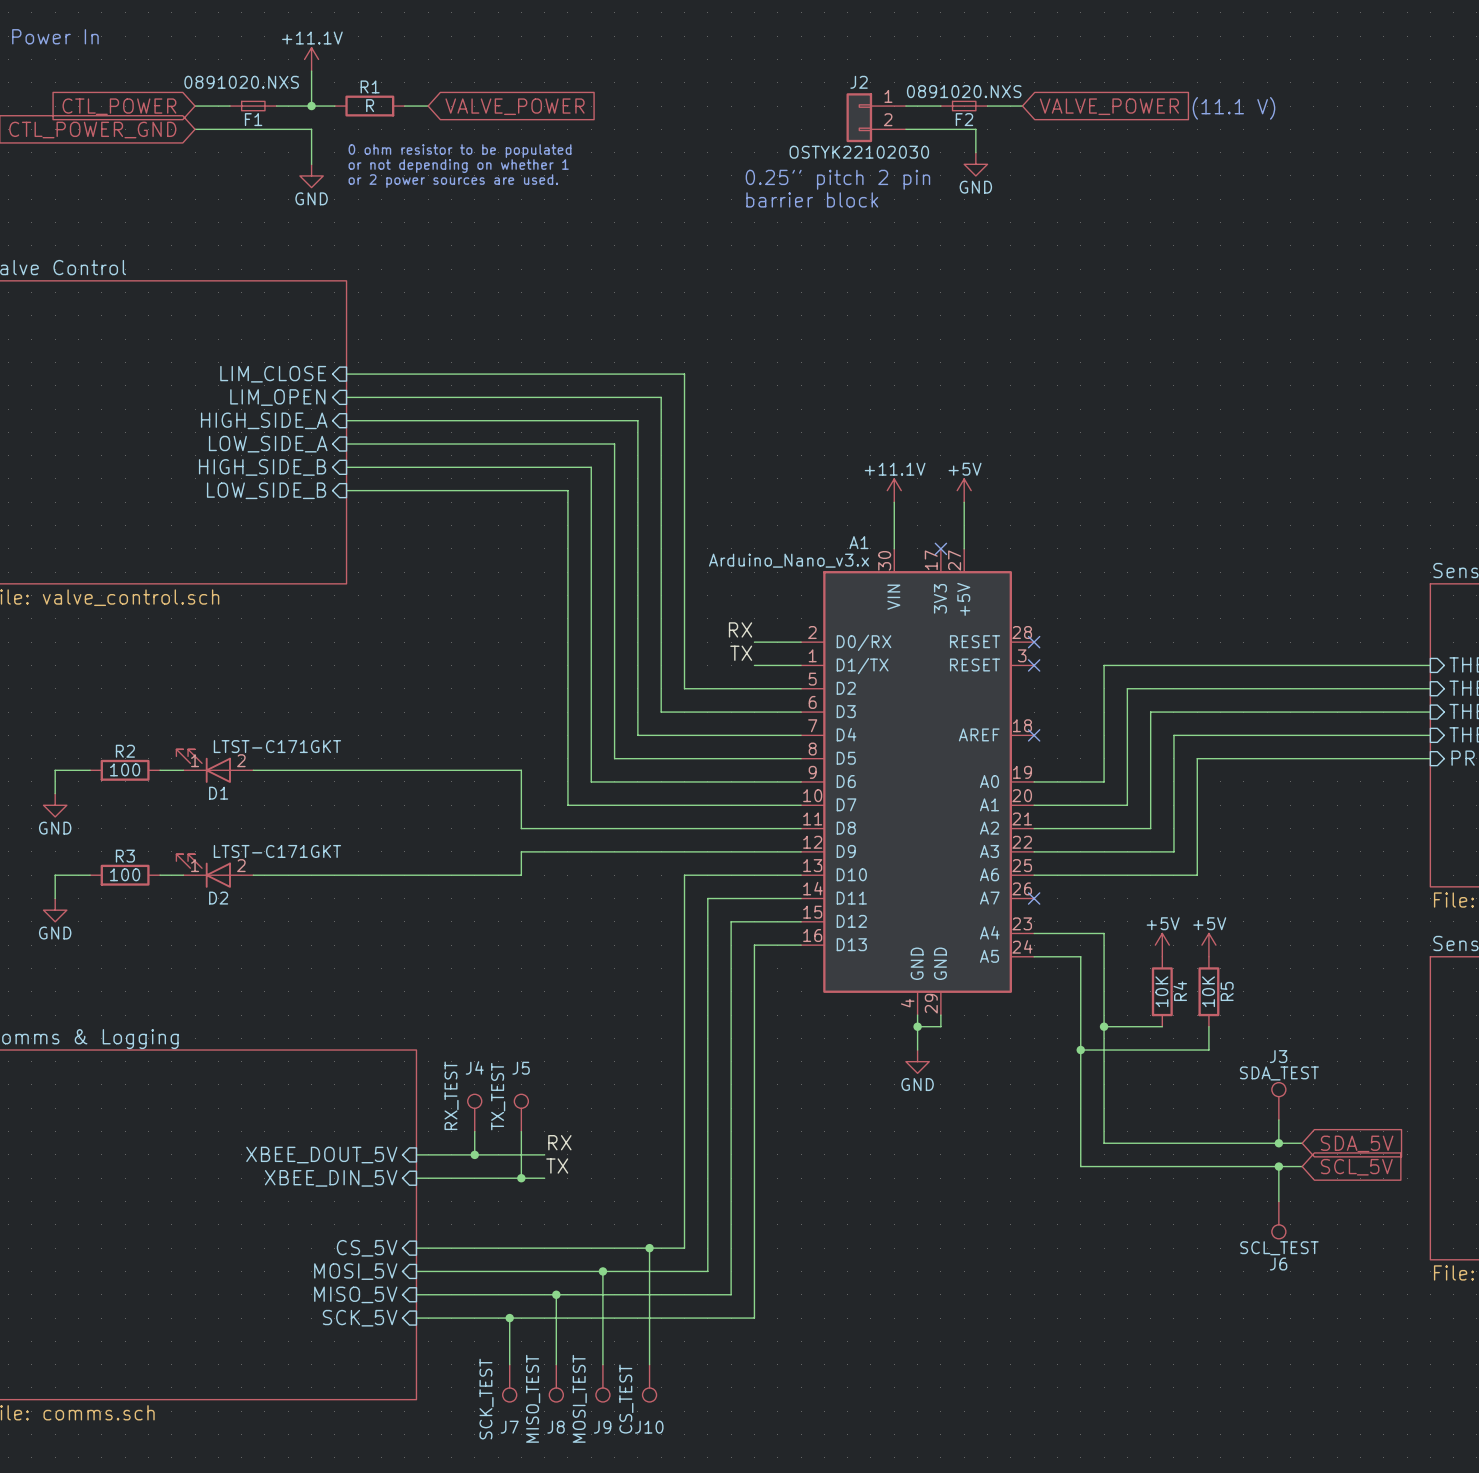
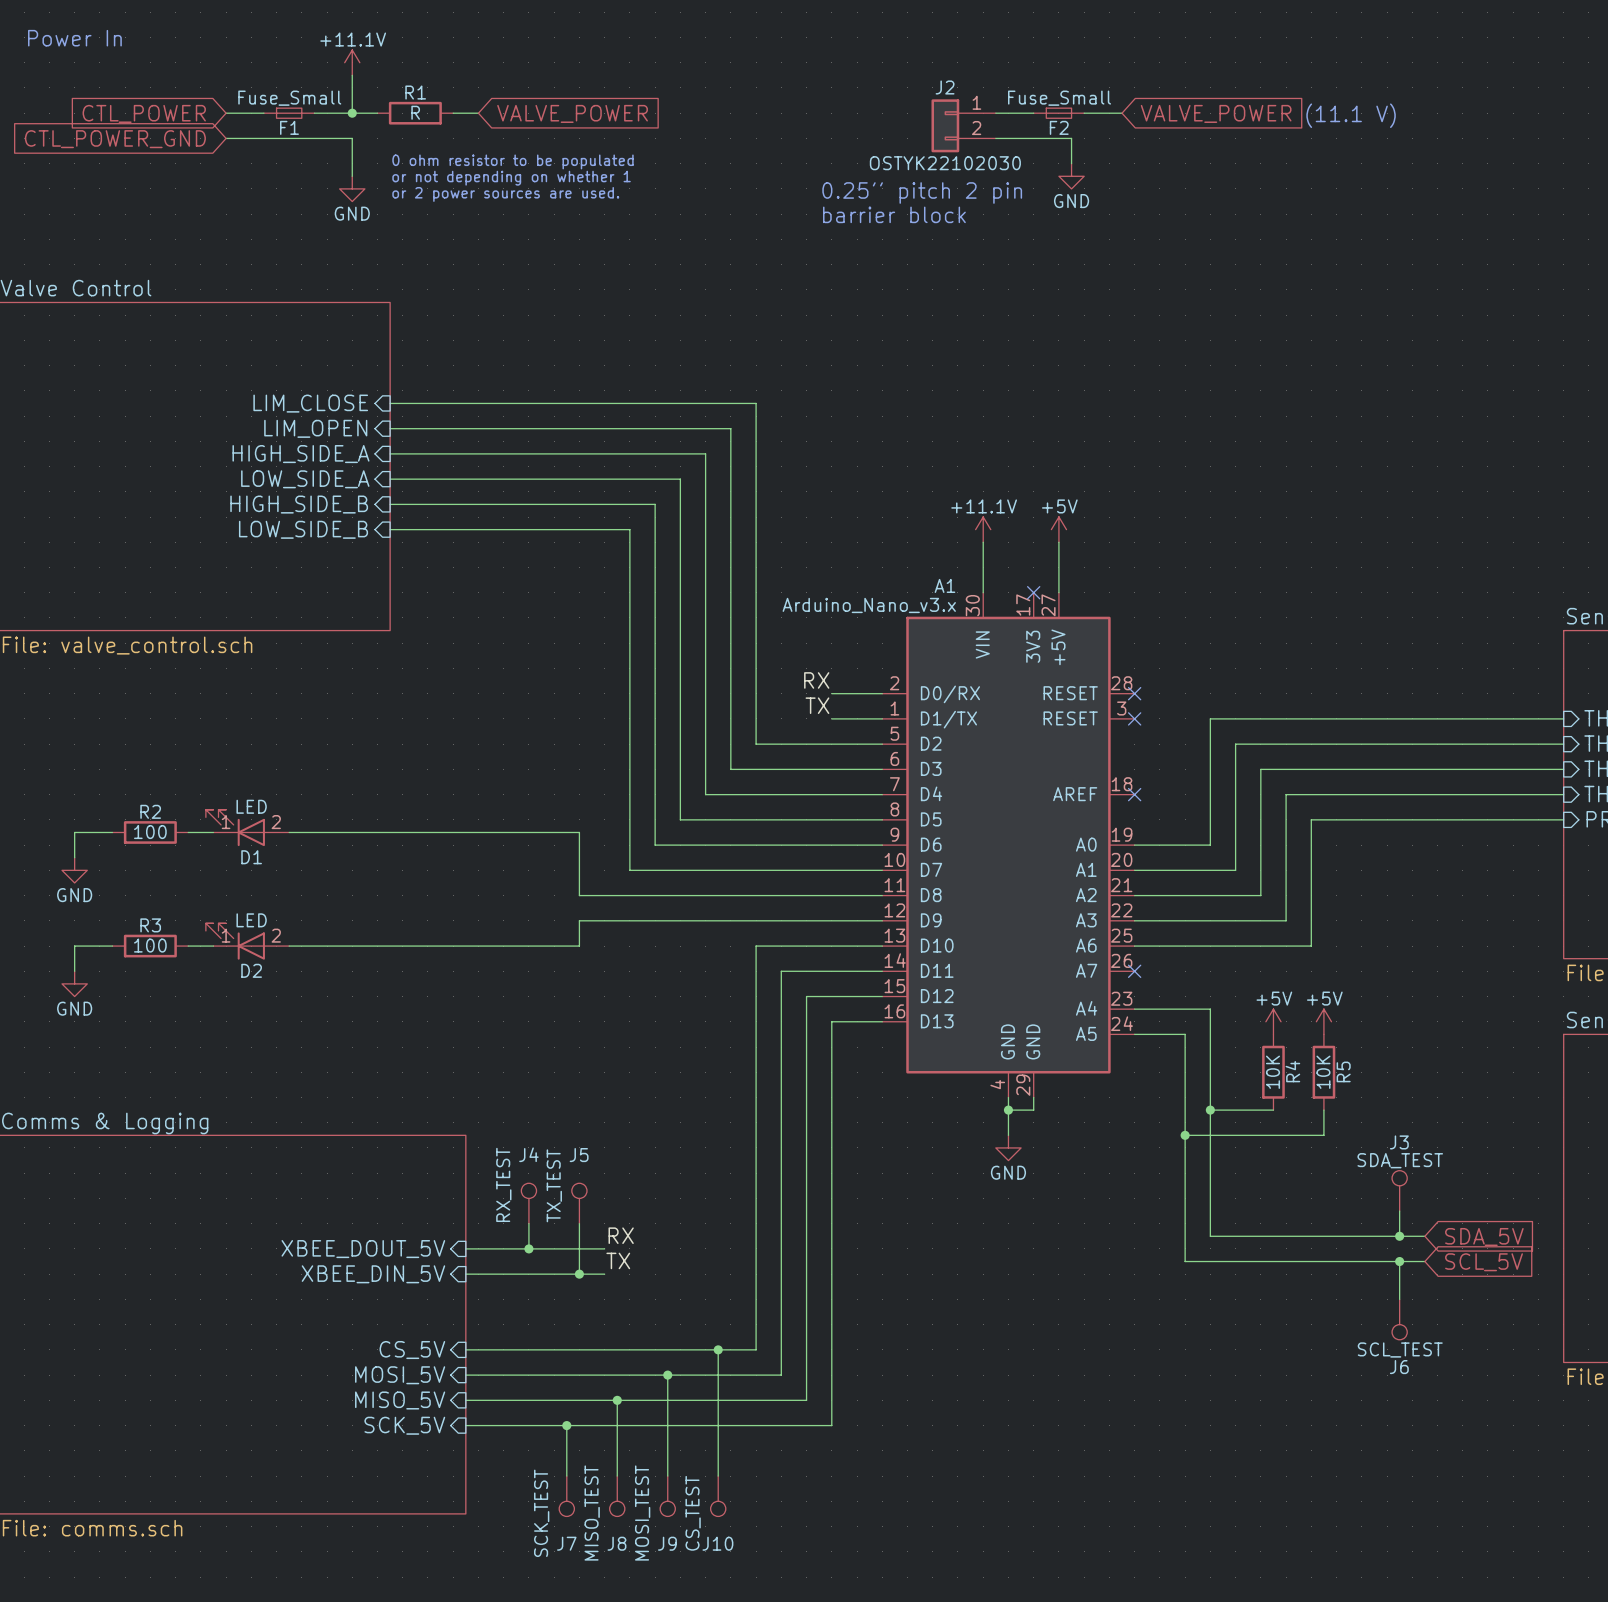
F1 value: 0891020.NXS (241, 82) -> Fuse_Small (289, 98)
F2 value: 0891020.NXS (964, 91) -> Fuse_Small (1059, 98)
D1 value: LTST-C171GKT (277, 746) -> LED (251, 806)
D2 value: LTST-C171GKT (277, 851) -> LED (251, 920)

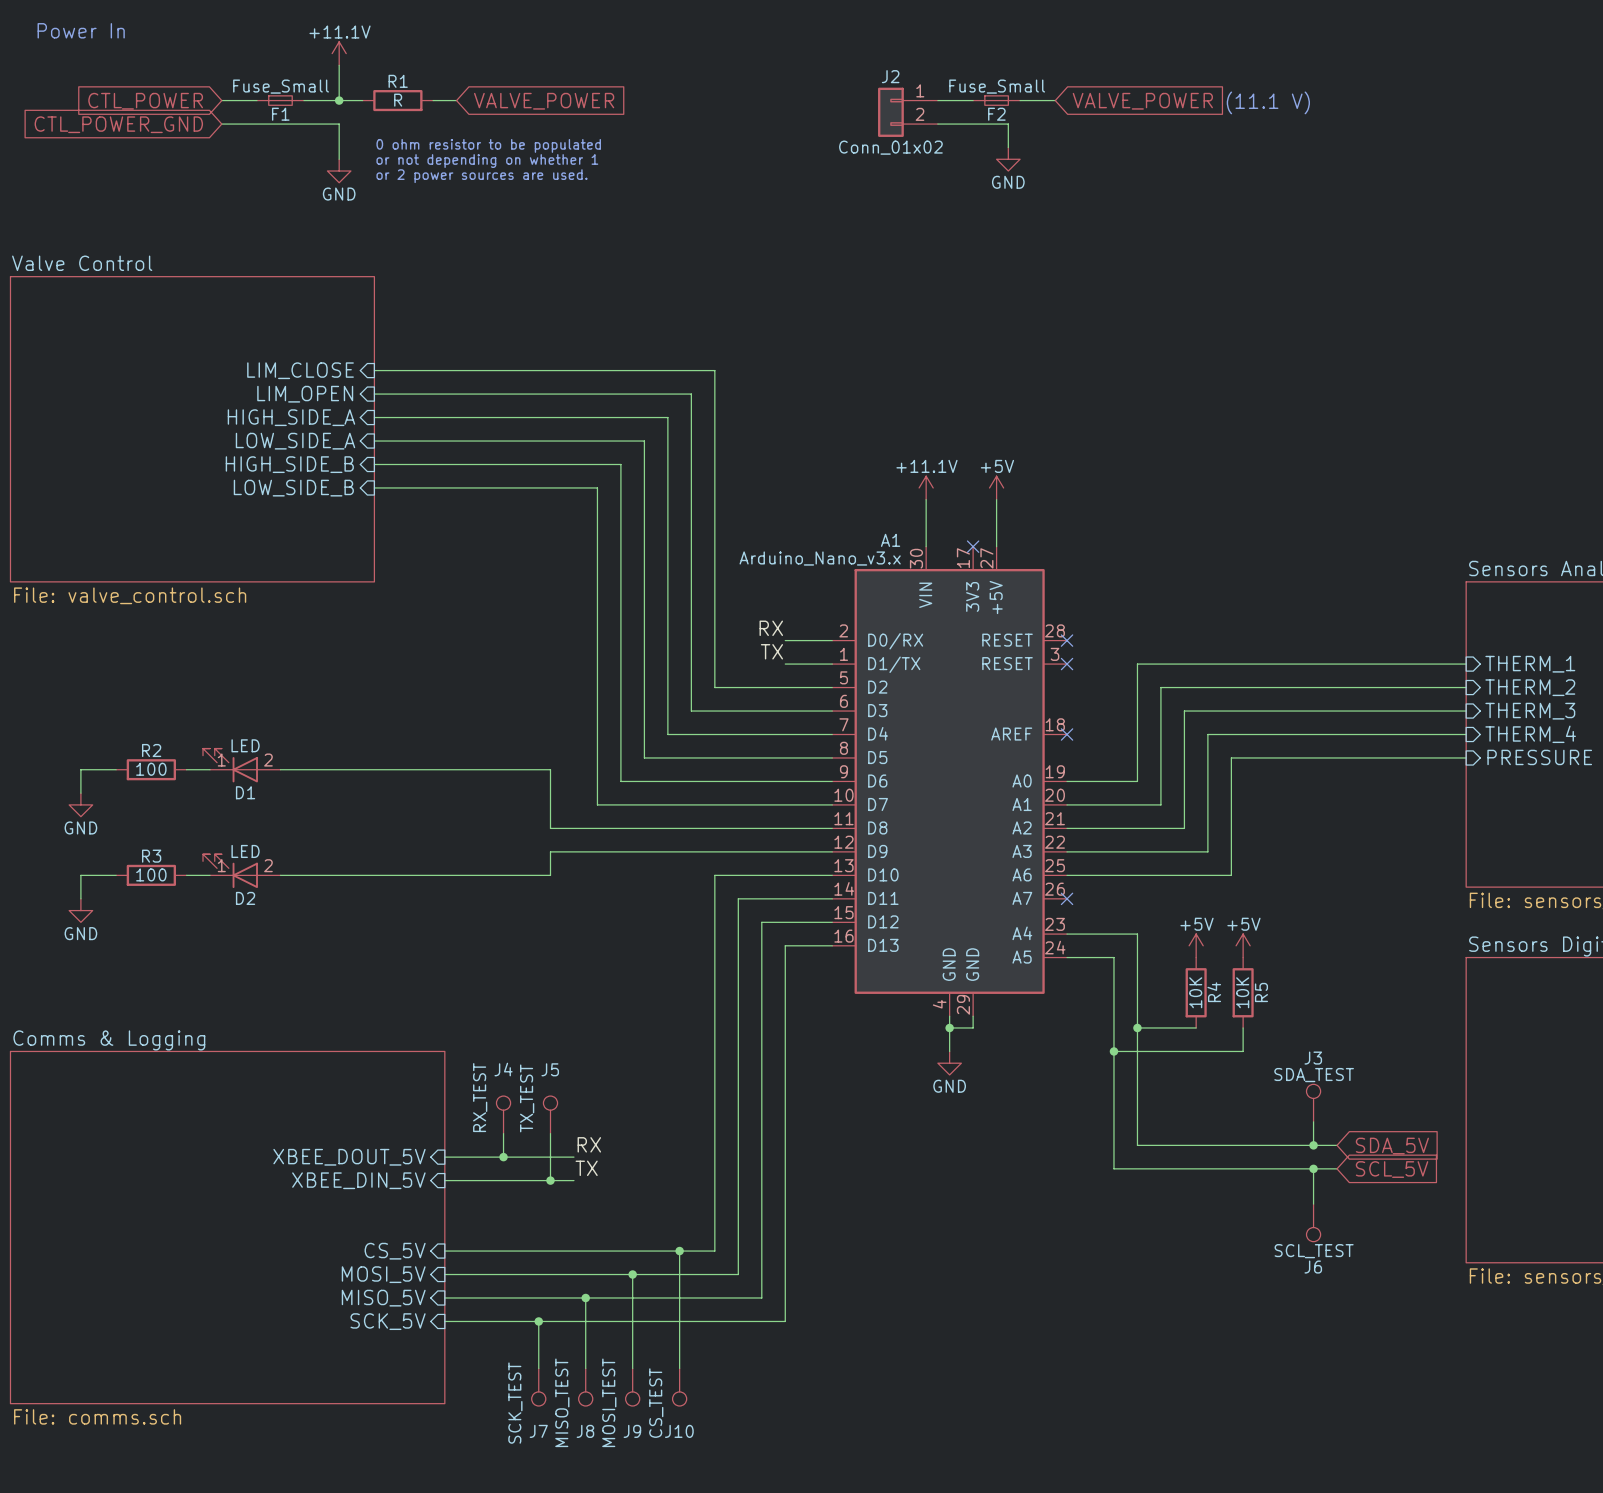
J2 value: OSTYK22102030 (945, 163) -> Conn_01x02 (890, 147)
text: 0.25'' pitch 2 pin (922, 193) -> none
text: barrier block (894, 214) -> none

